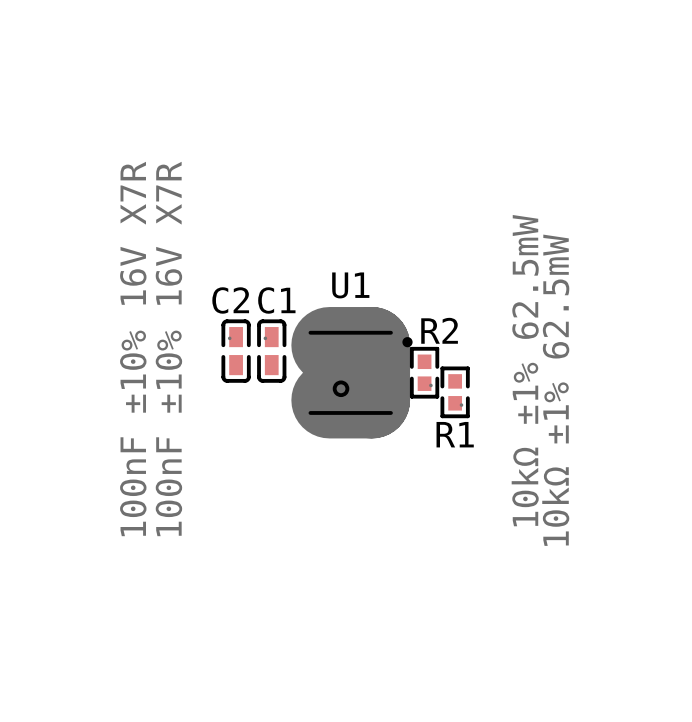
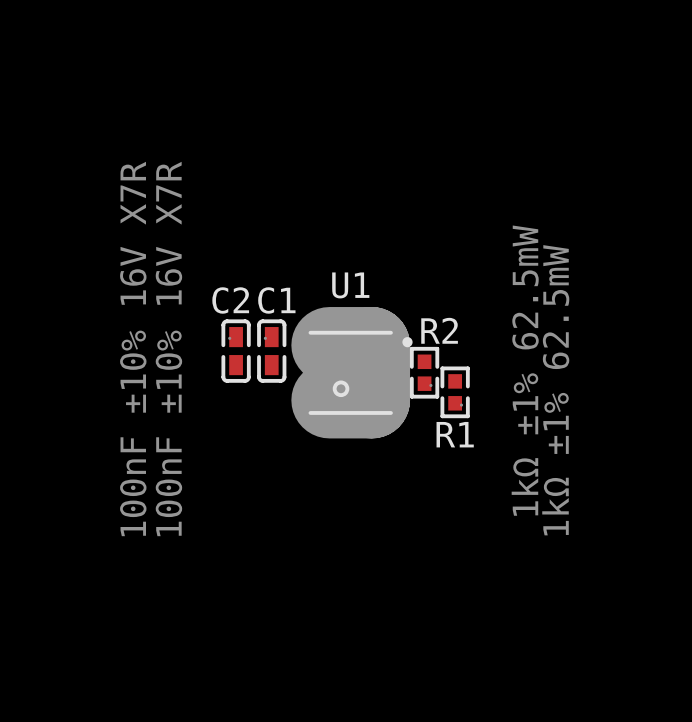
R2 value: 10kΩ ±1% 62.5mW (525, 370) -> 1kΩ ±1% 62.5mW (525, 370)
R1 value: 10kΩ ±1% 62.5mW (555, 390) -> 1kΩ ±1% 62.5mW (555, 390)

